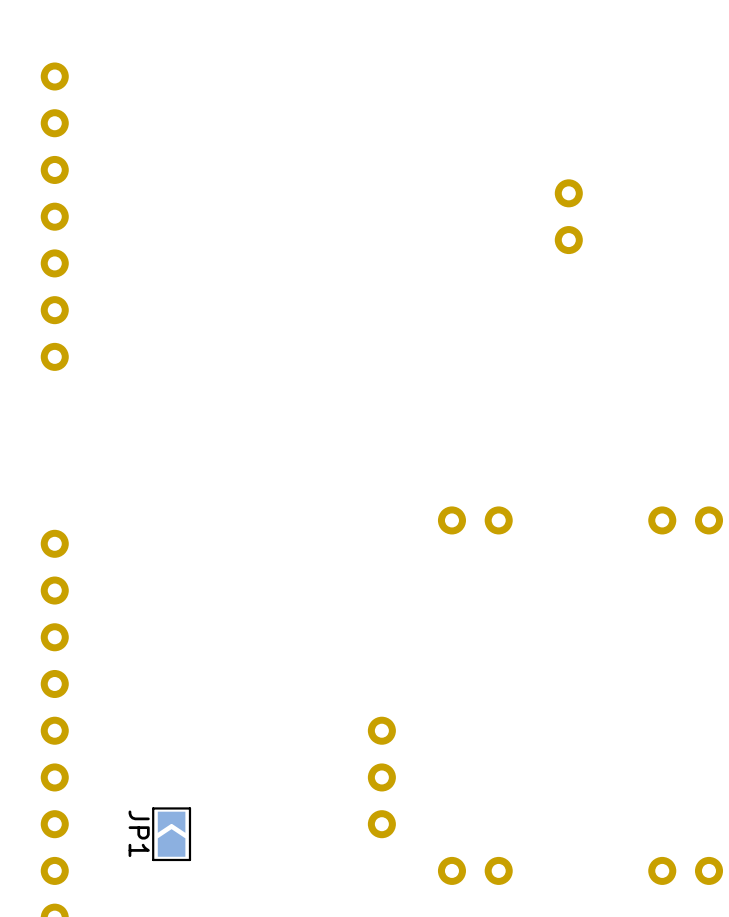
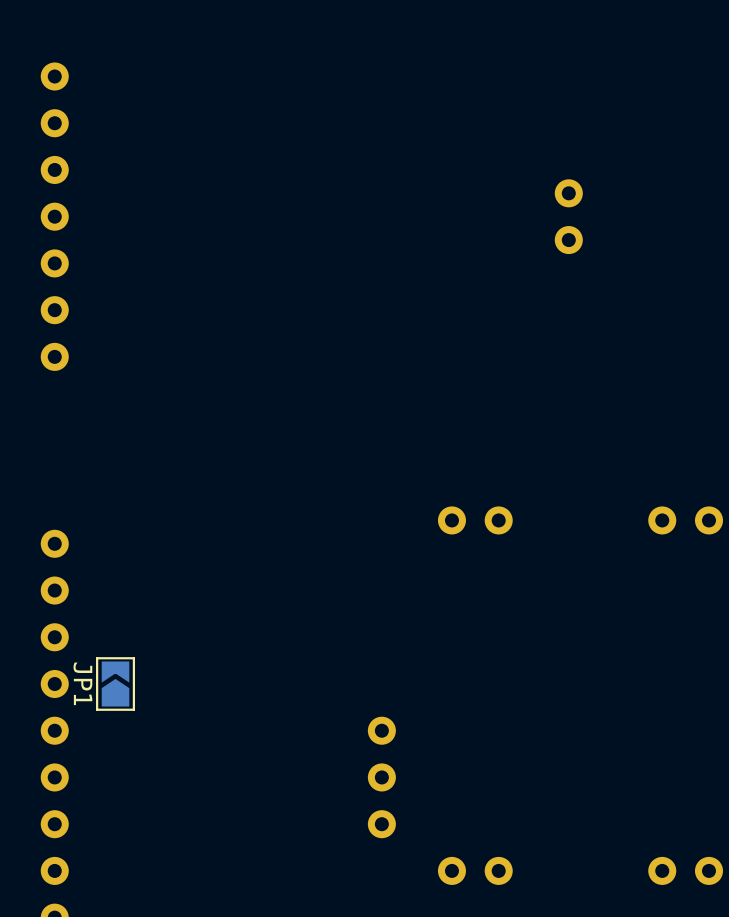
JP1 position: (171, 834) -> (115, 684)

